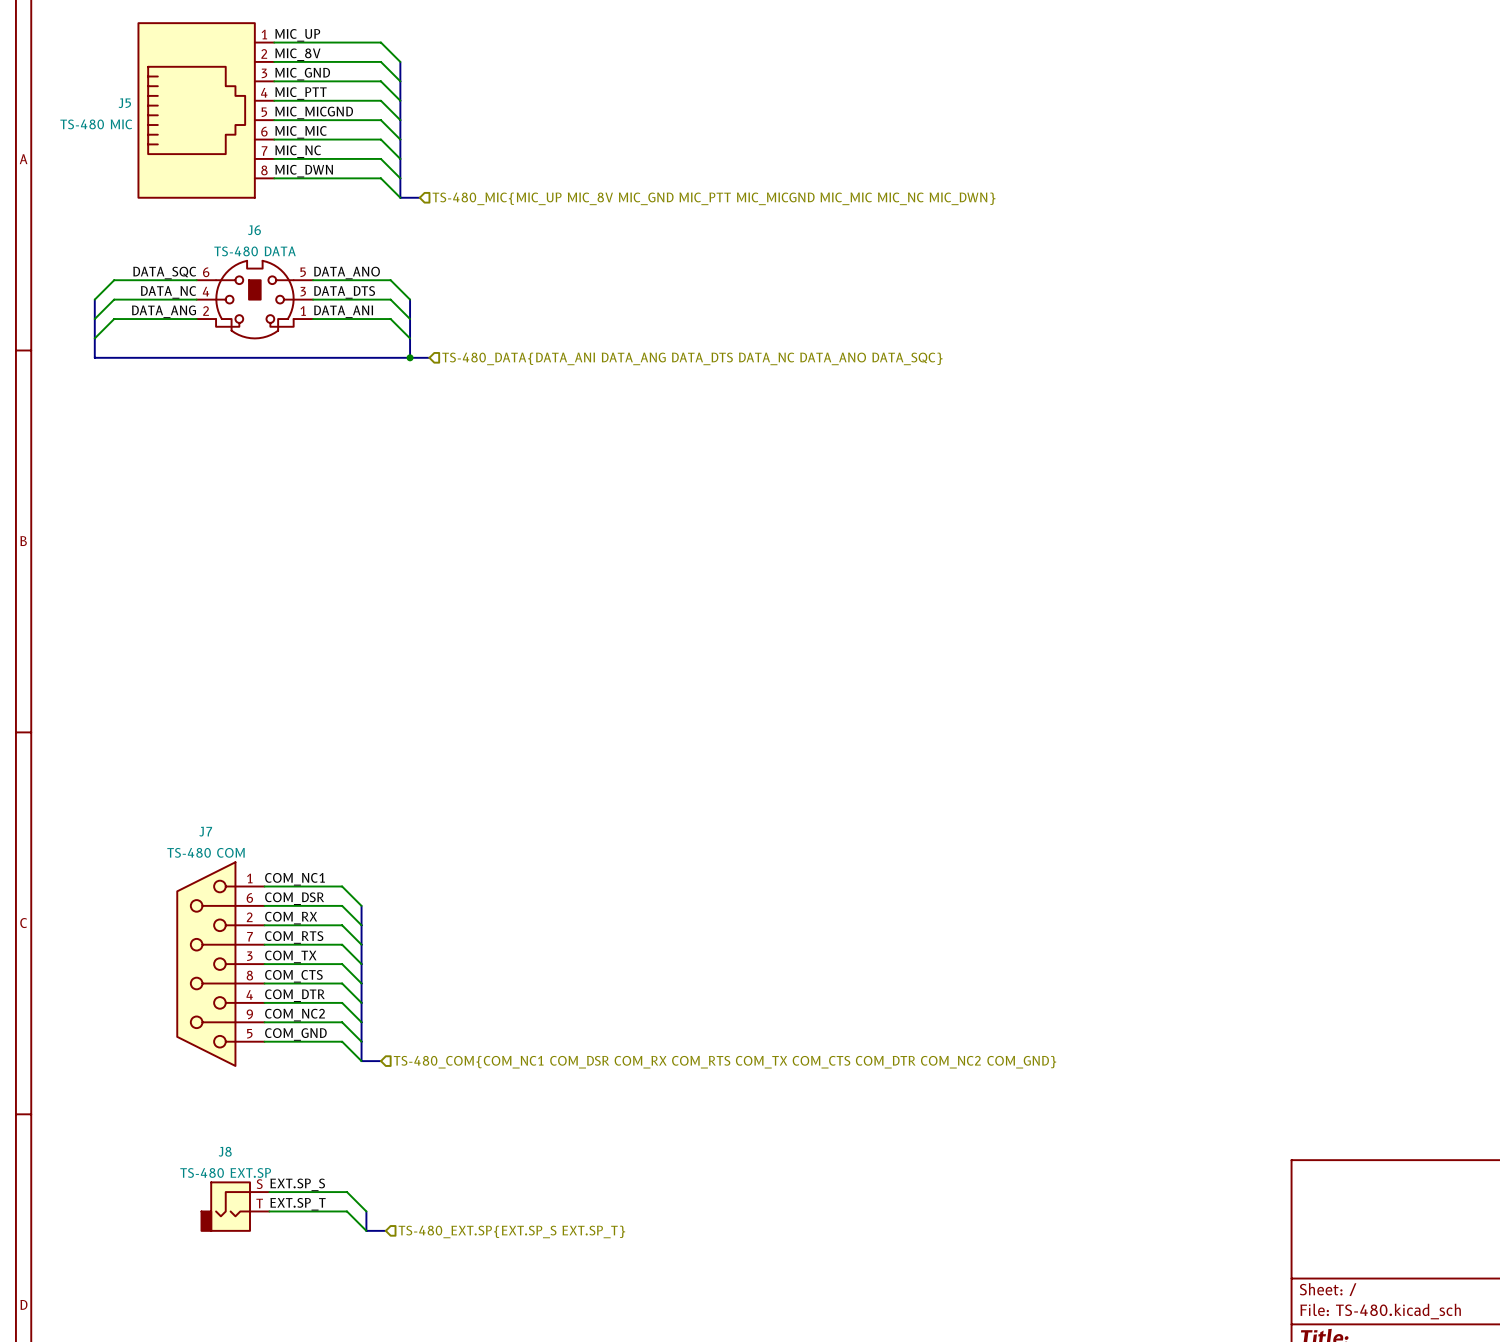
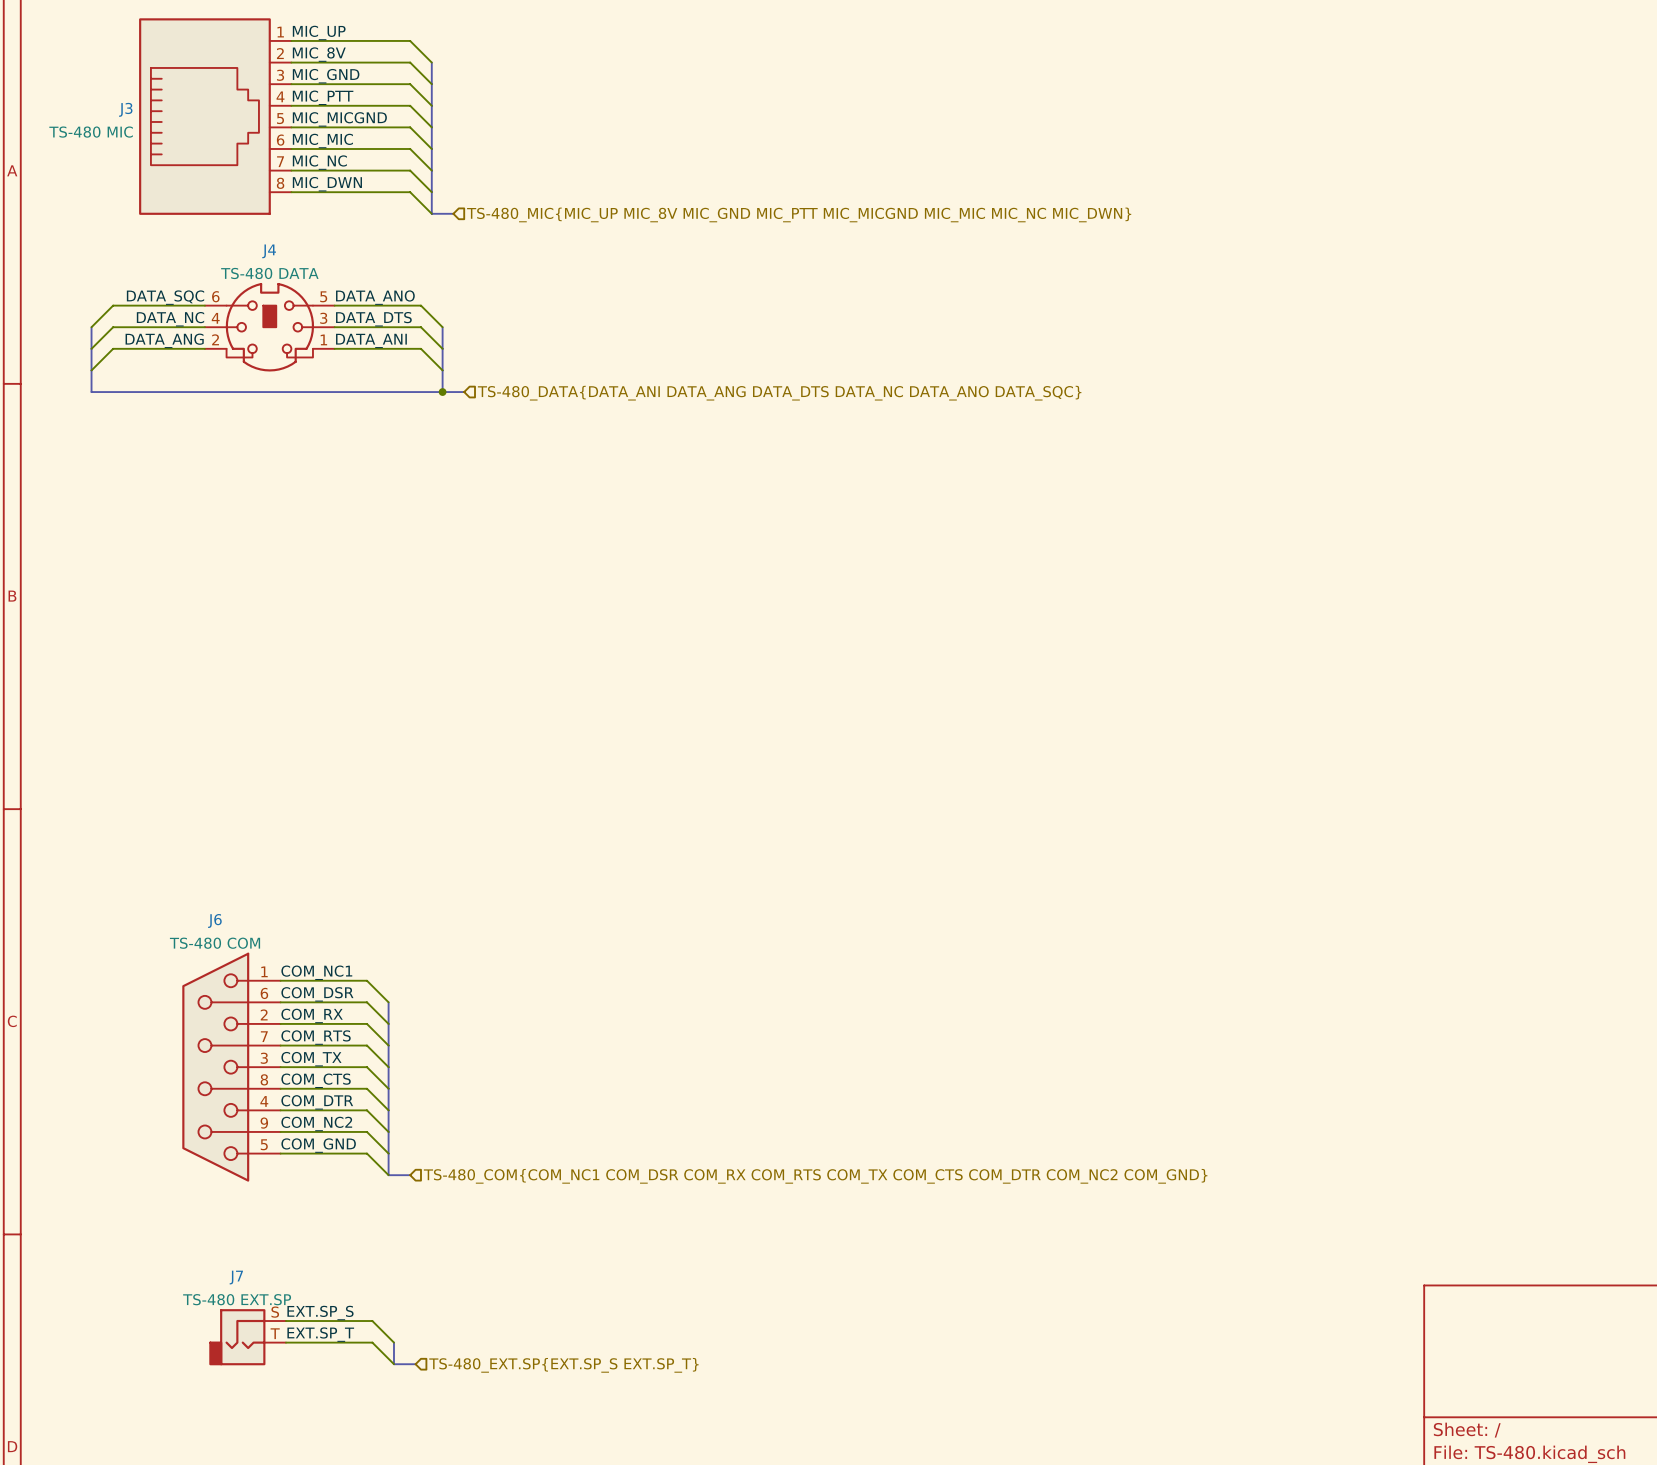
J5 name: J5 (124, 103) -> J3 (125, 109)
J6 name: J6 (254, 230) -> J4 (269, 251)
J7 name: J7 (205, 831) -> J6 (214, 920)
J8 name: J8 (225, 1151) -> J7 (236, 1277)

